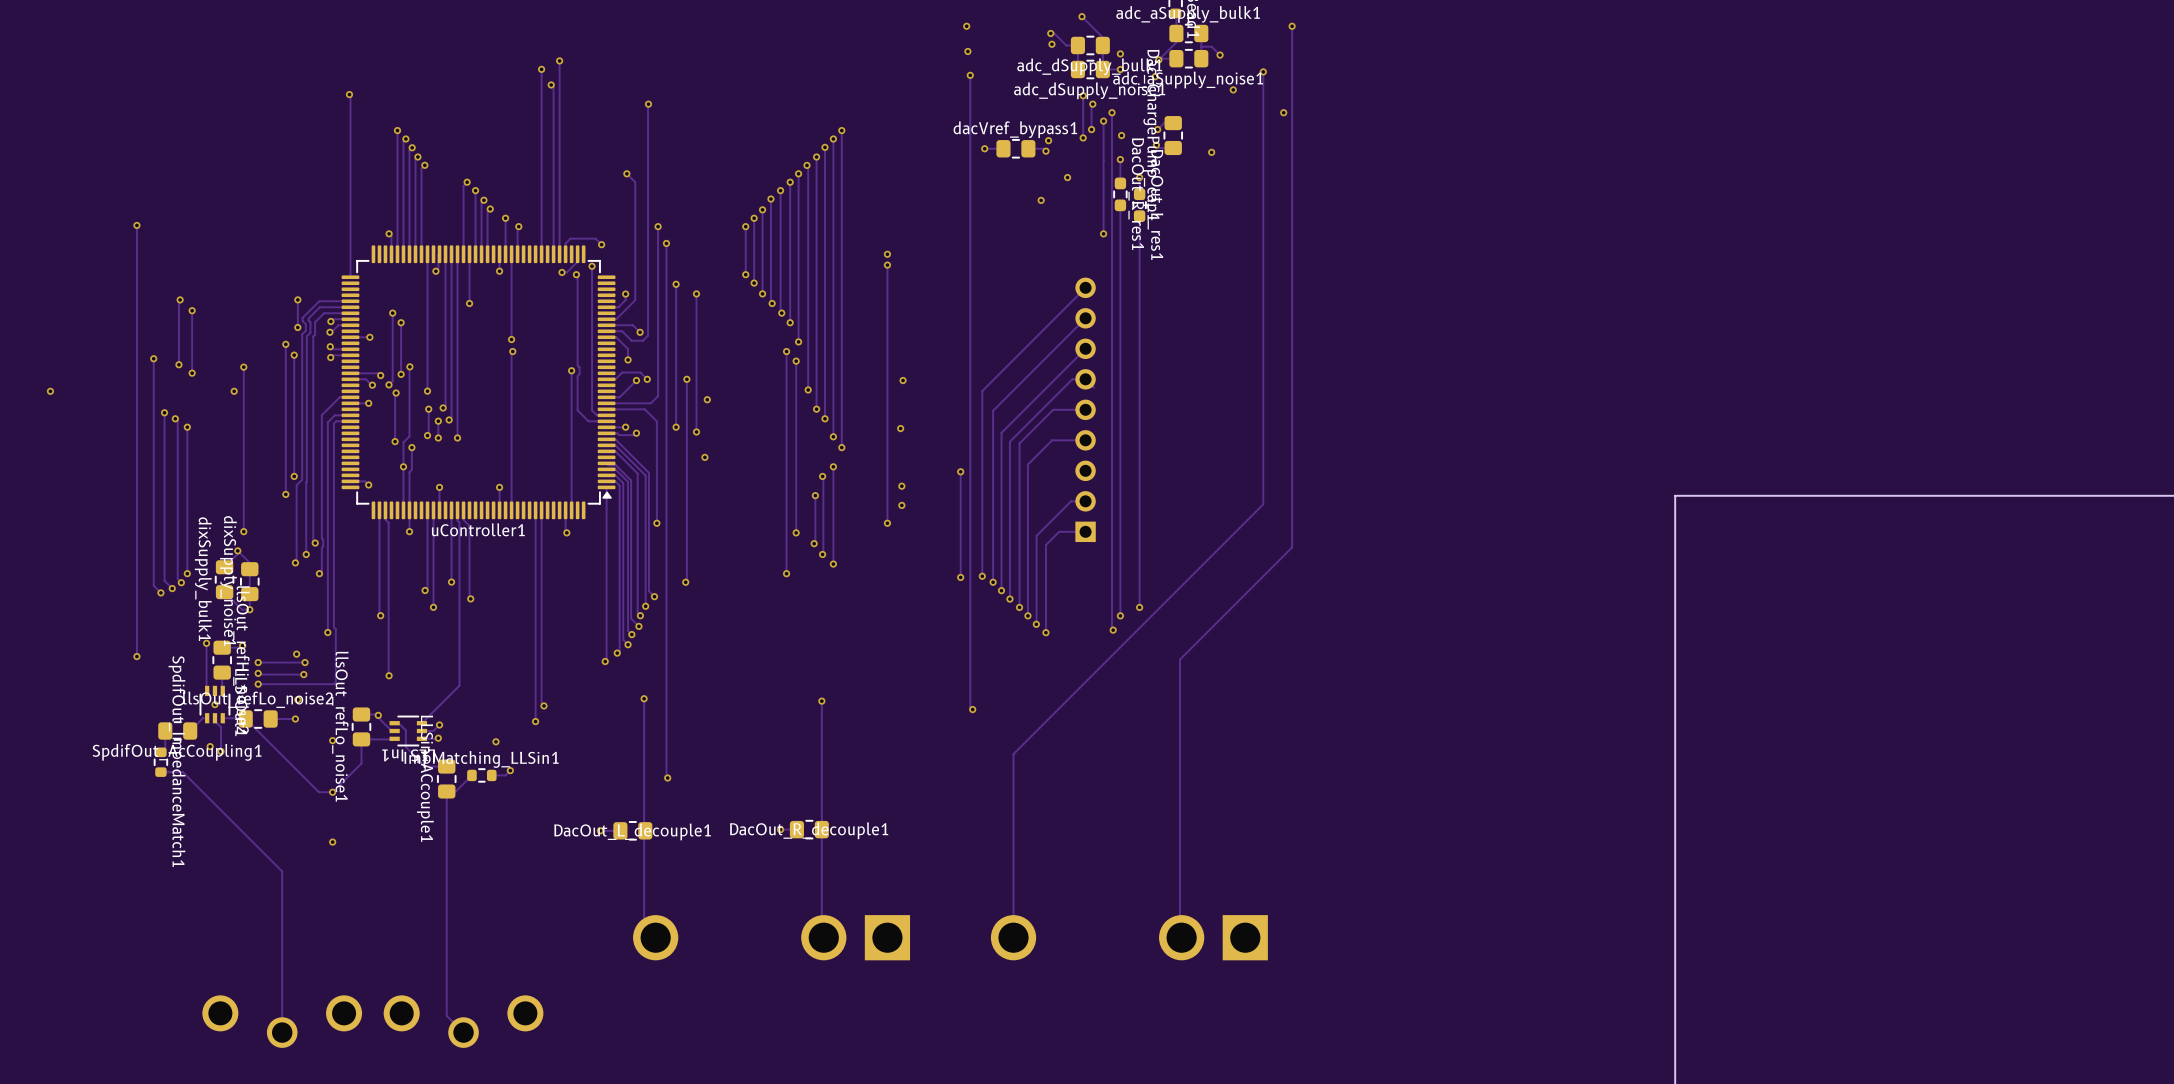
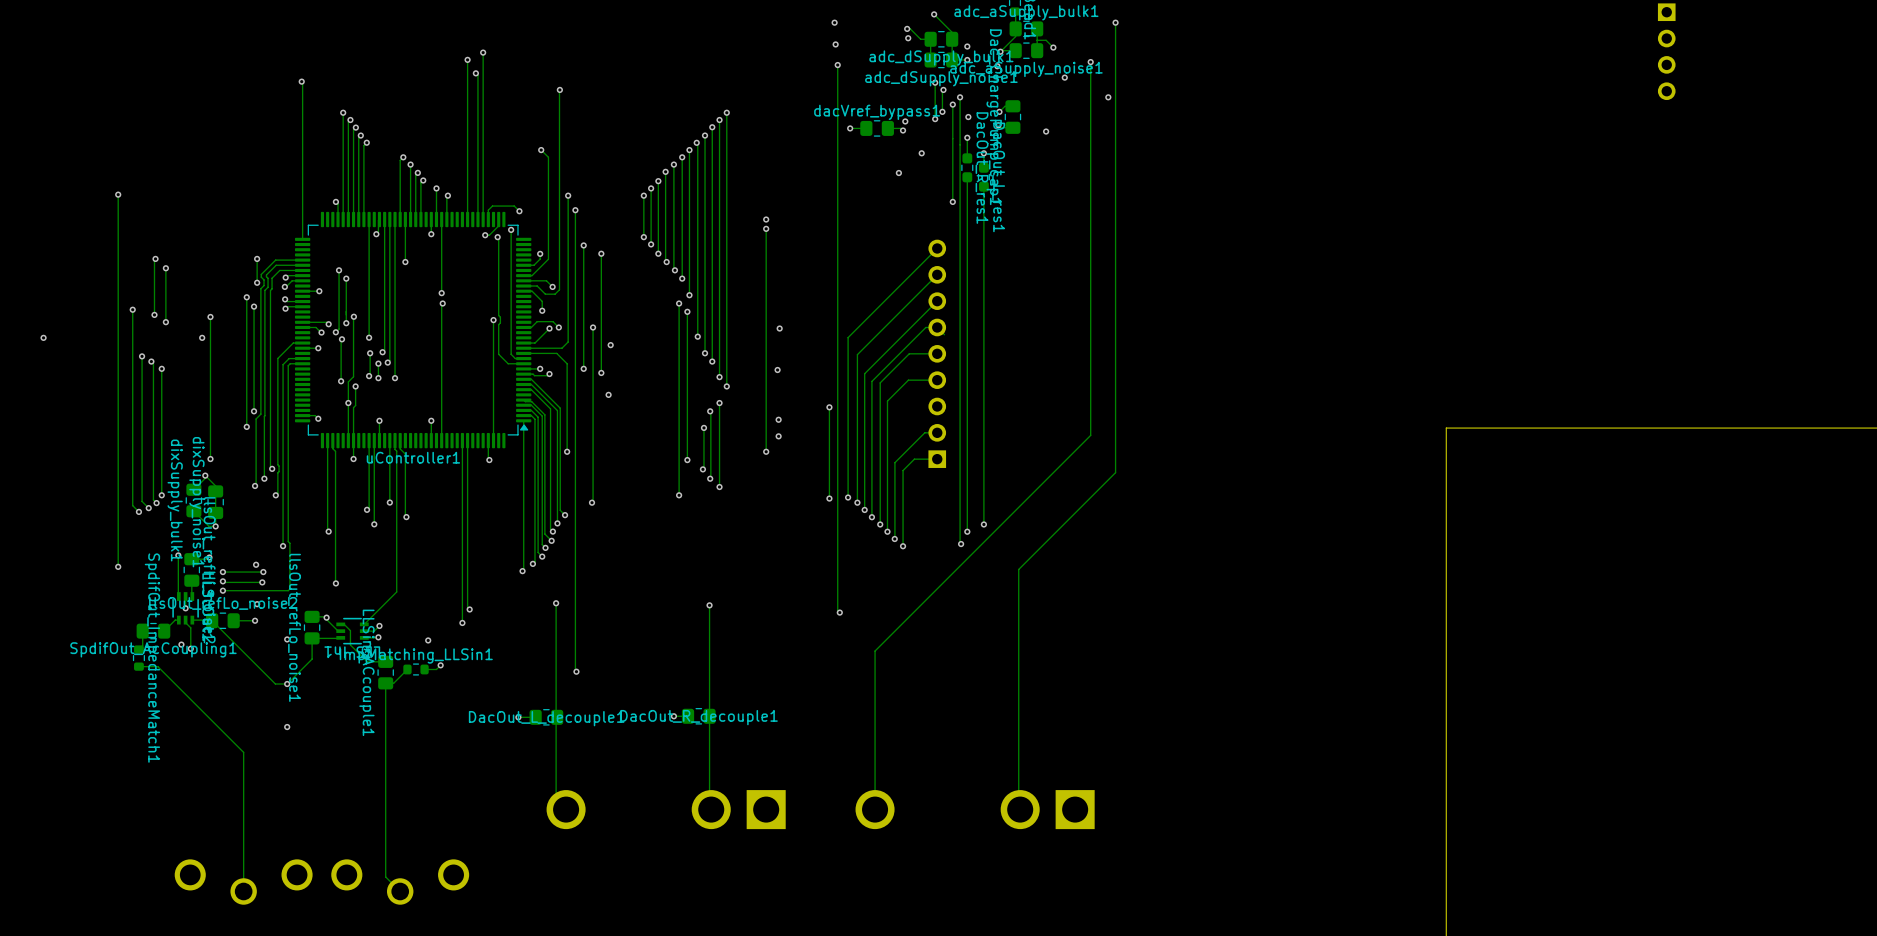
part: none -> (1666, 51)

